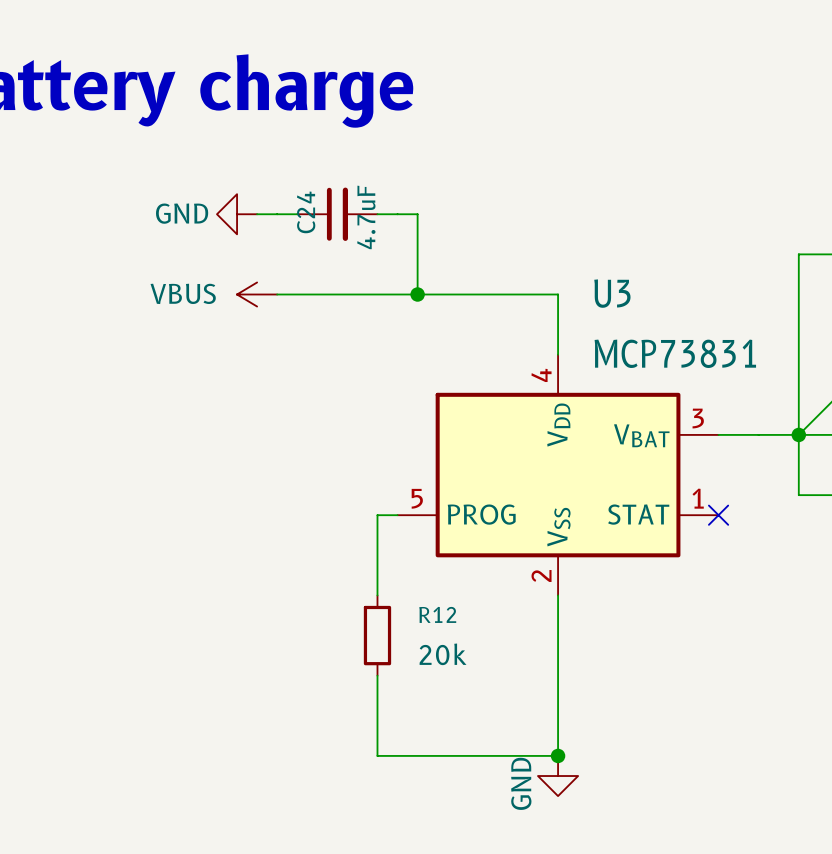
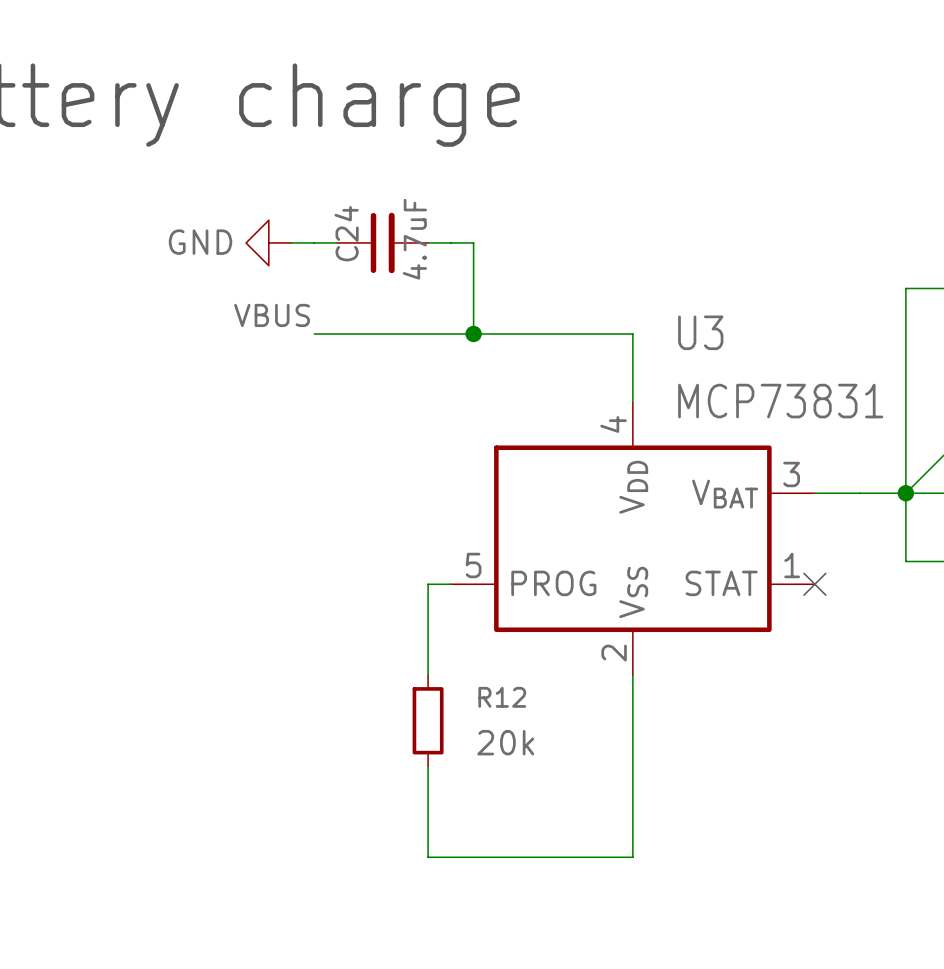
label: none -> VBUS (272, 315)
power symbol: VBUS (257, 294) -> none
junction: (558, 755) -> none
power symbol: GND (558, 776) -> none

